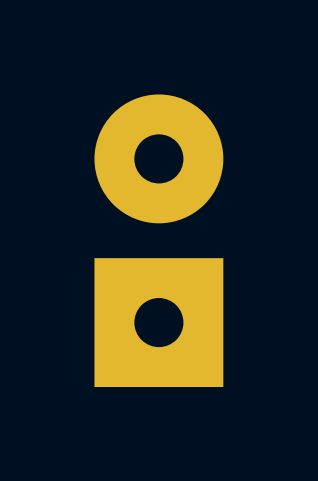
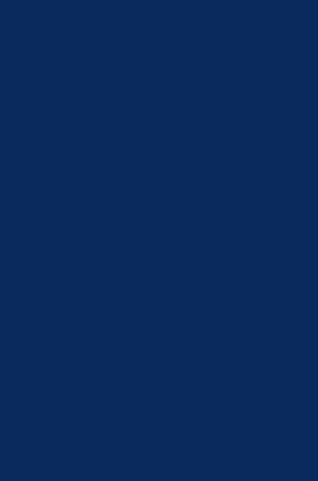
part: (158, 240) -> none

